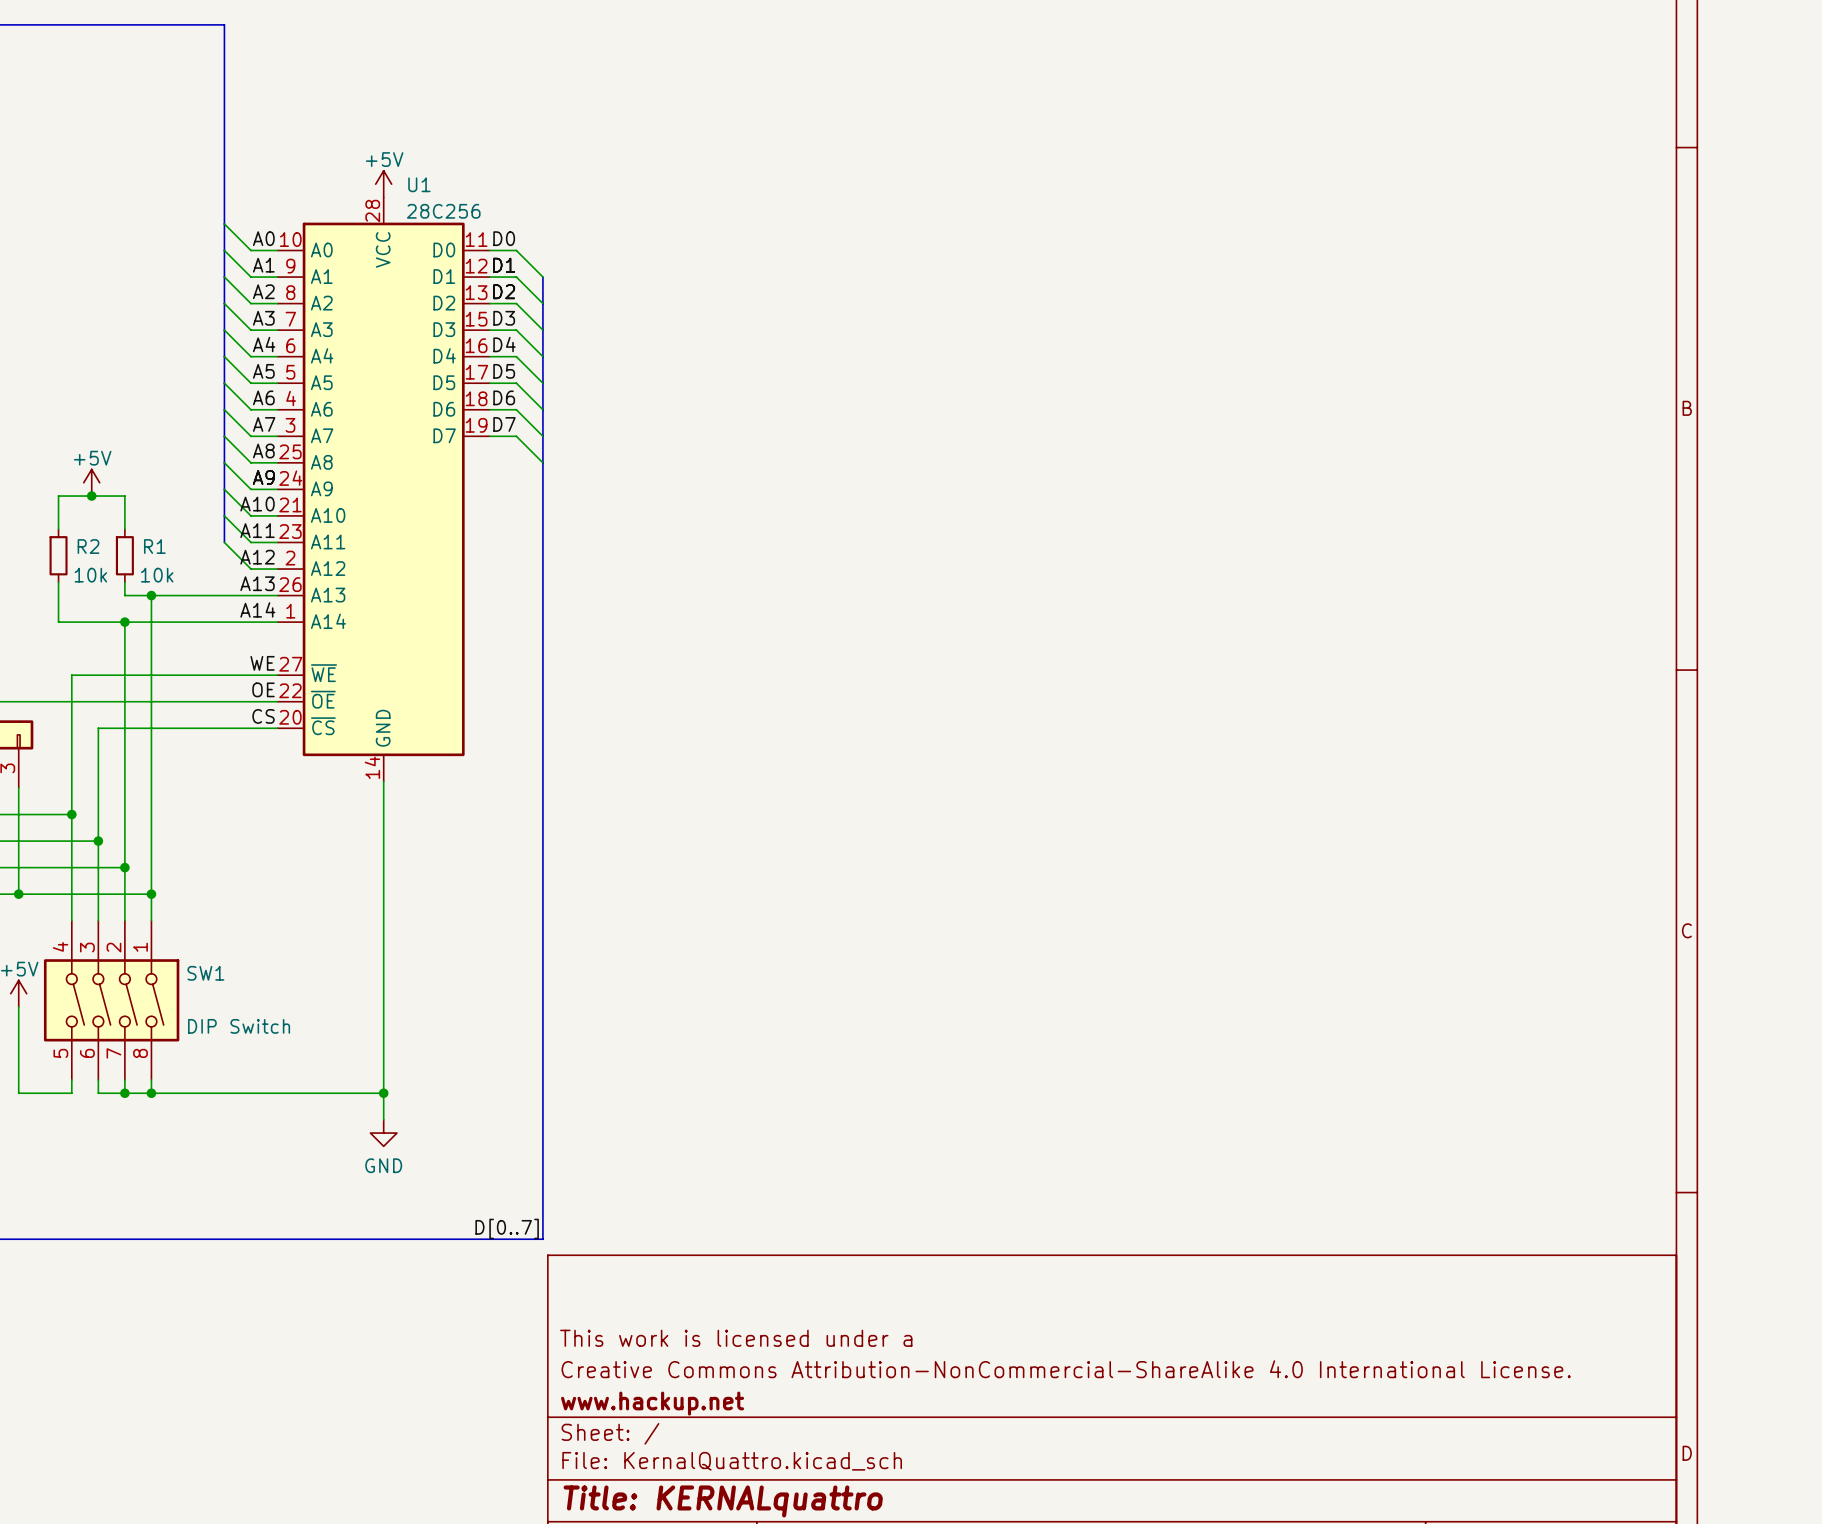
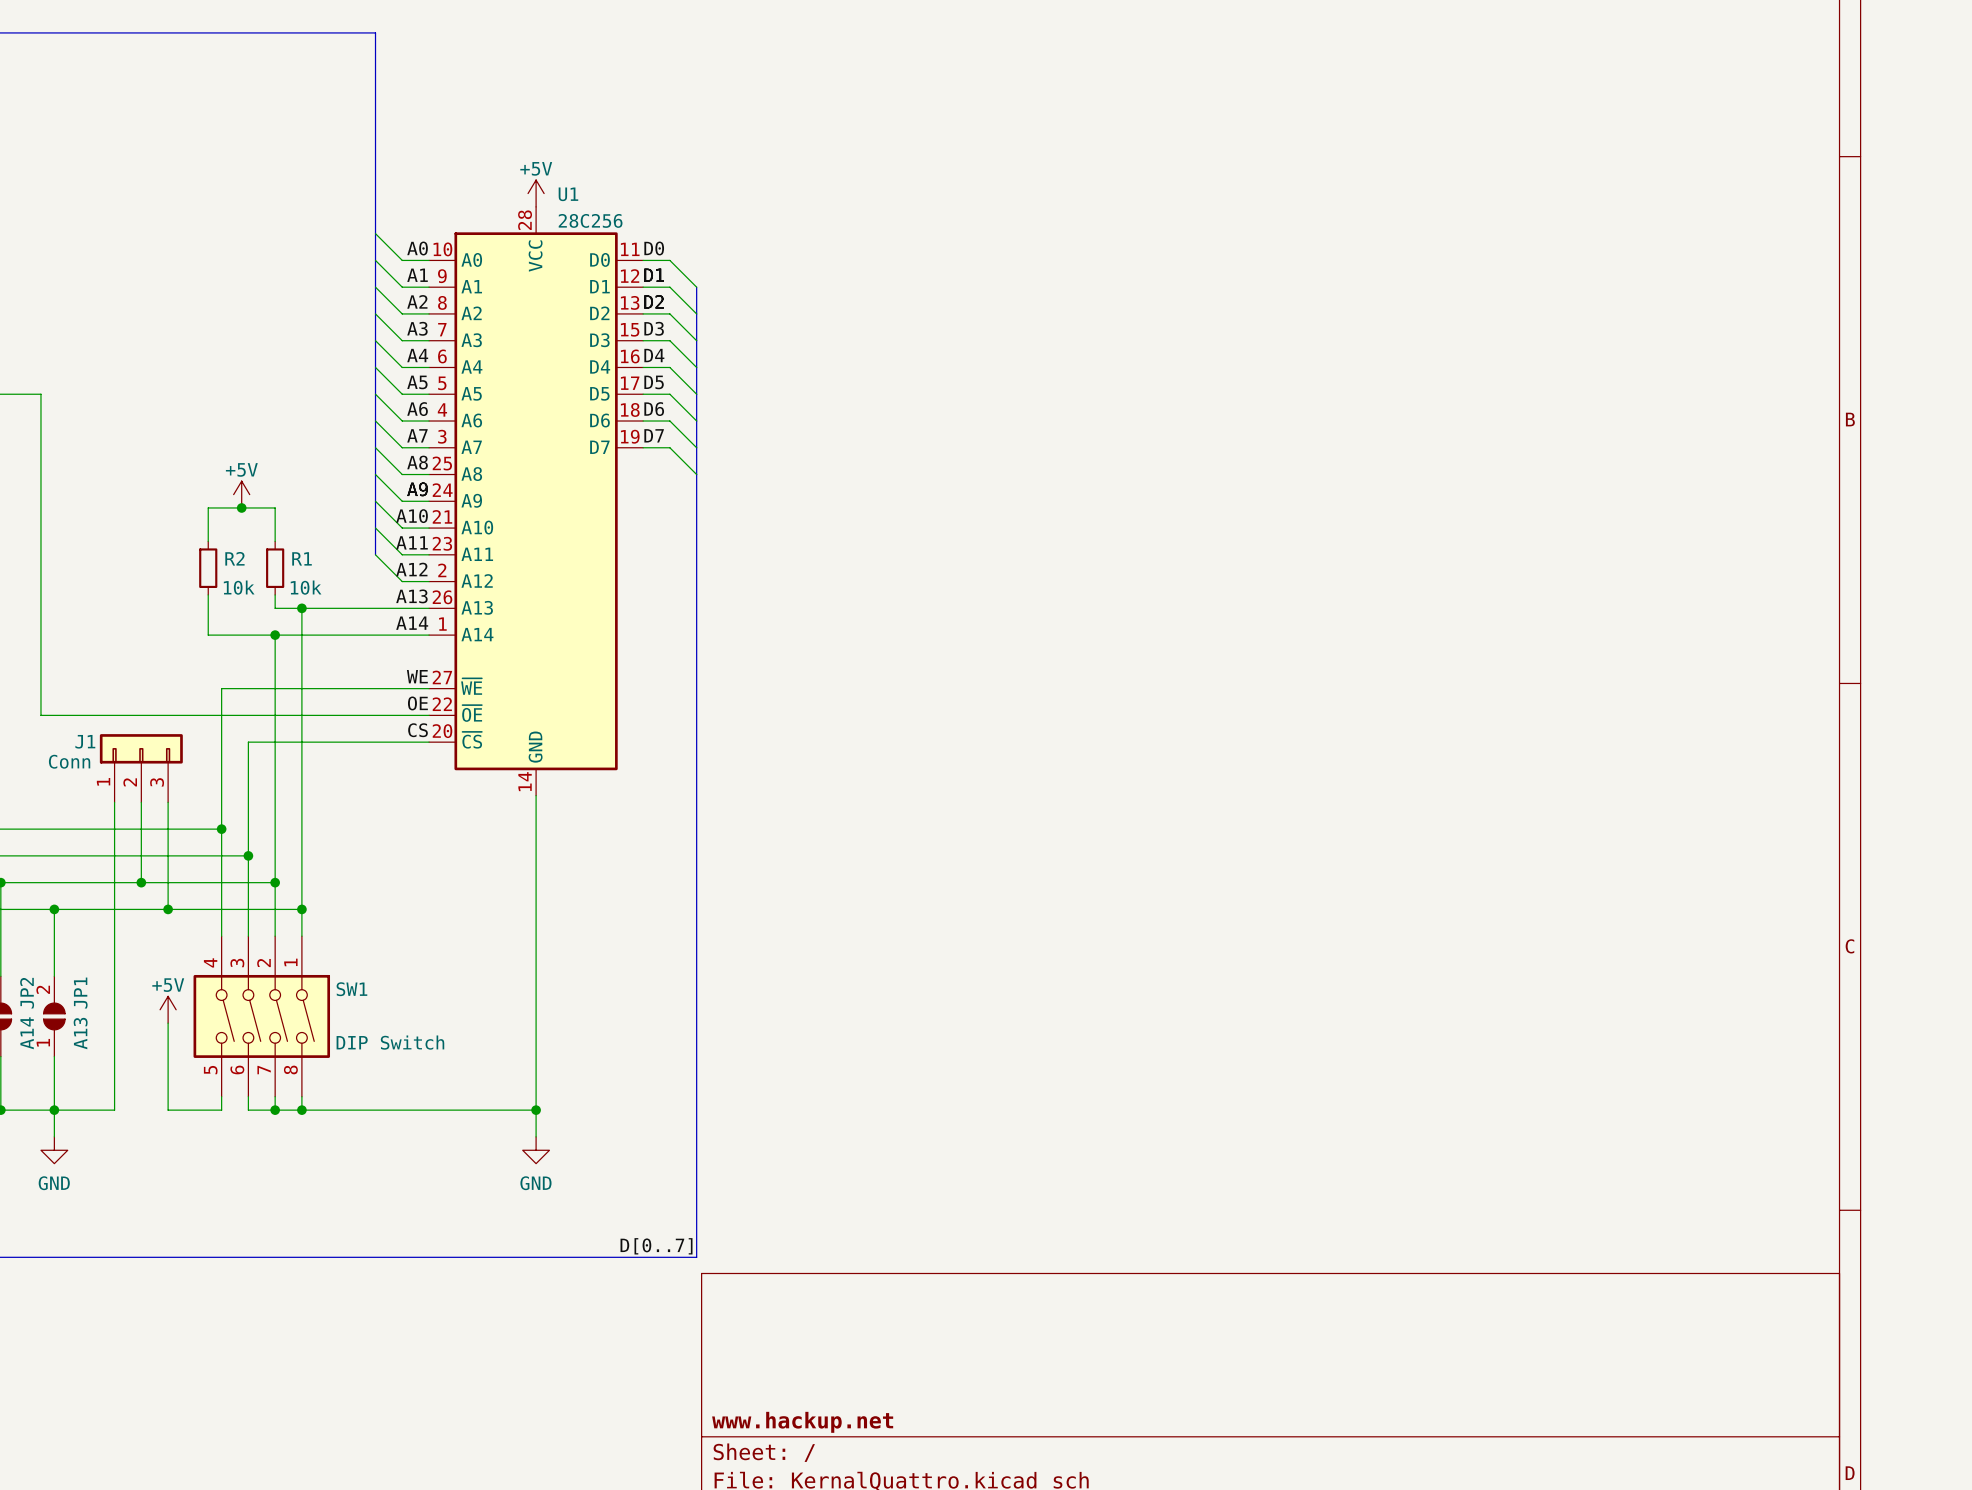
title block: This work is licensed under a (736, 1338) -> none
title block: Creative Commons Attribution-NonCommercial-ShareAlike 4.0 International License. (1066, 1369) -> none

